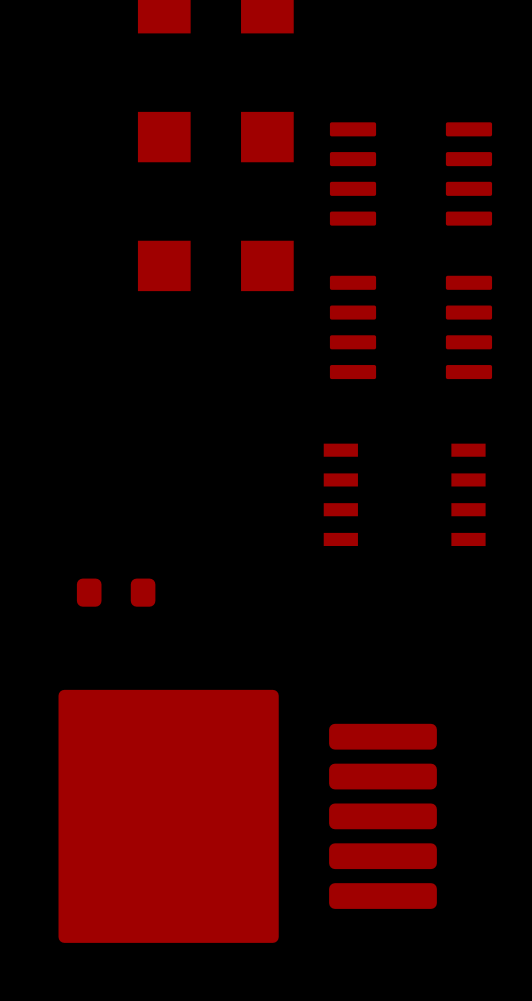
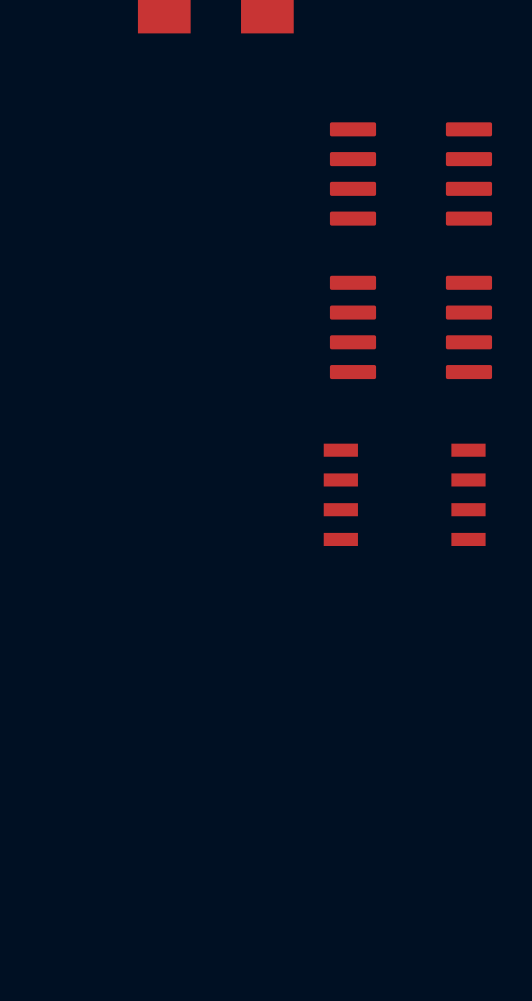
part: (215, 137) -> none
part: (215, 265) -> none
part: (116, 592) -> none
part: (247, 816) -> none

